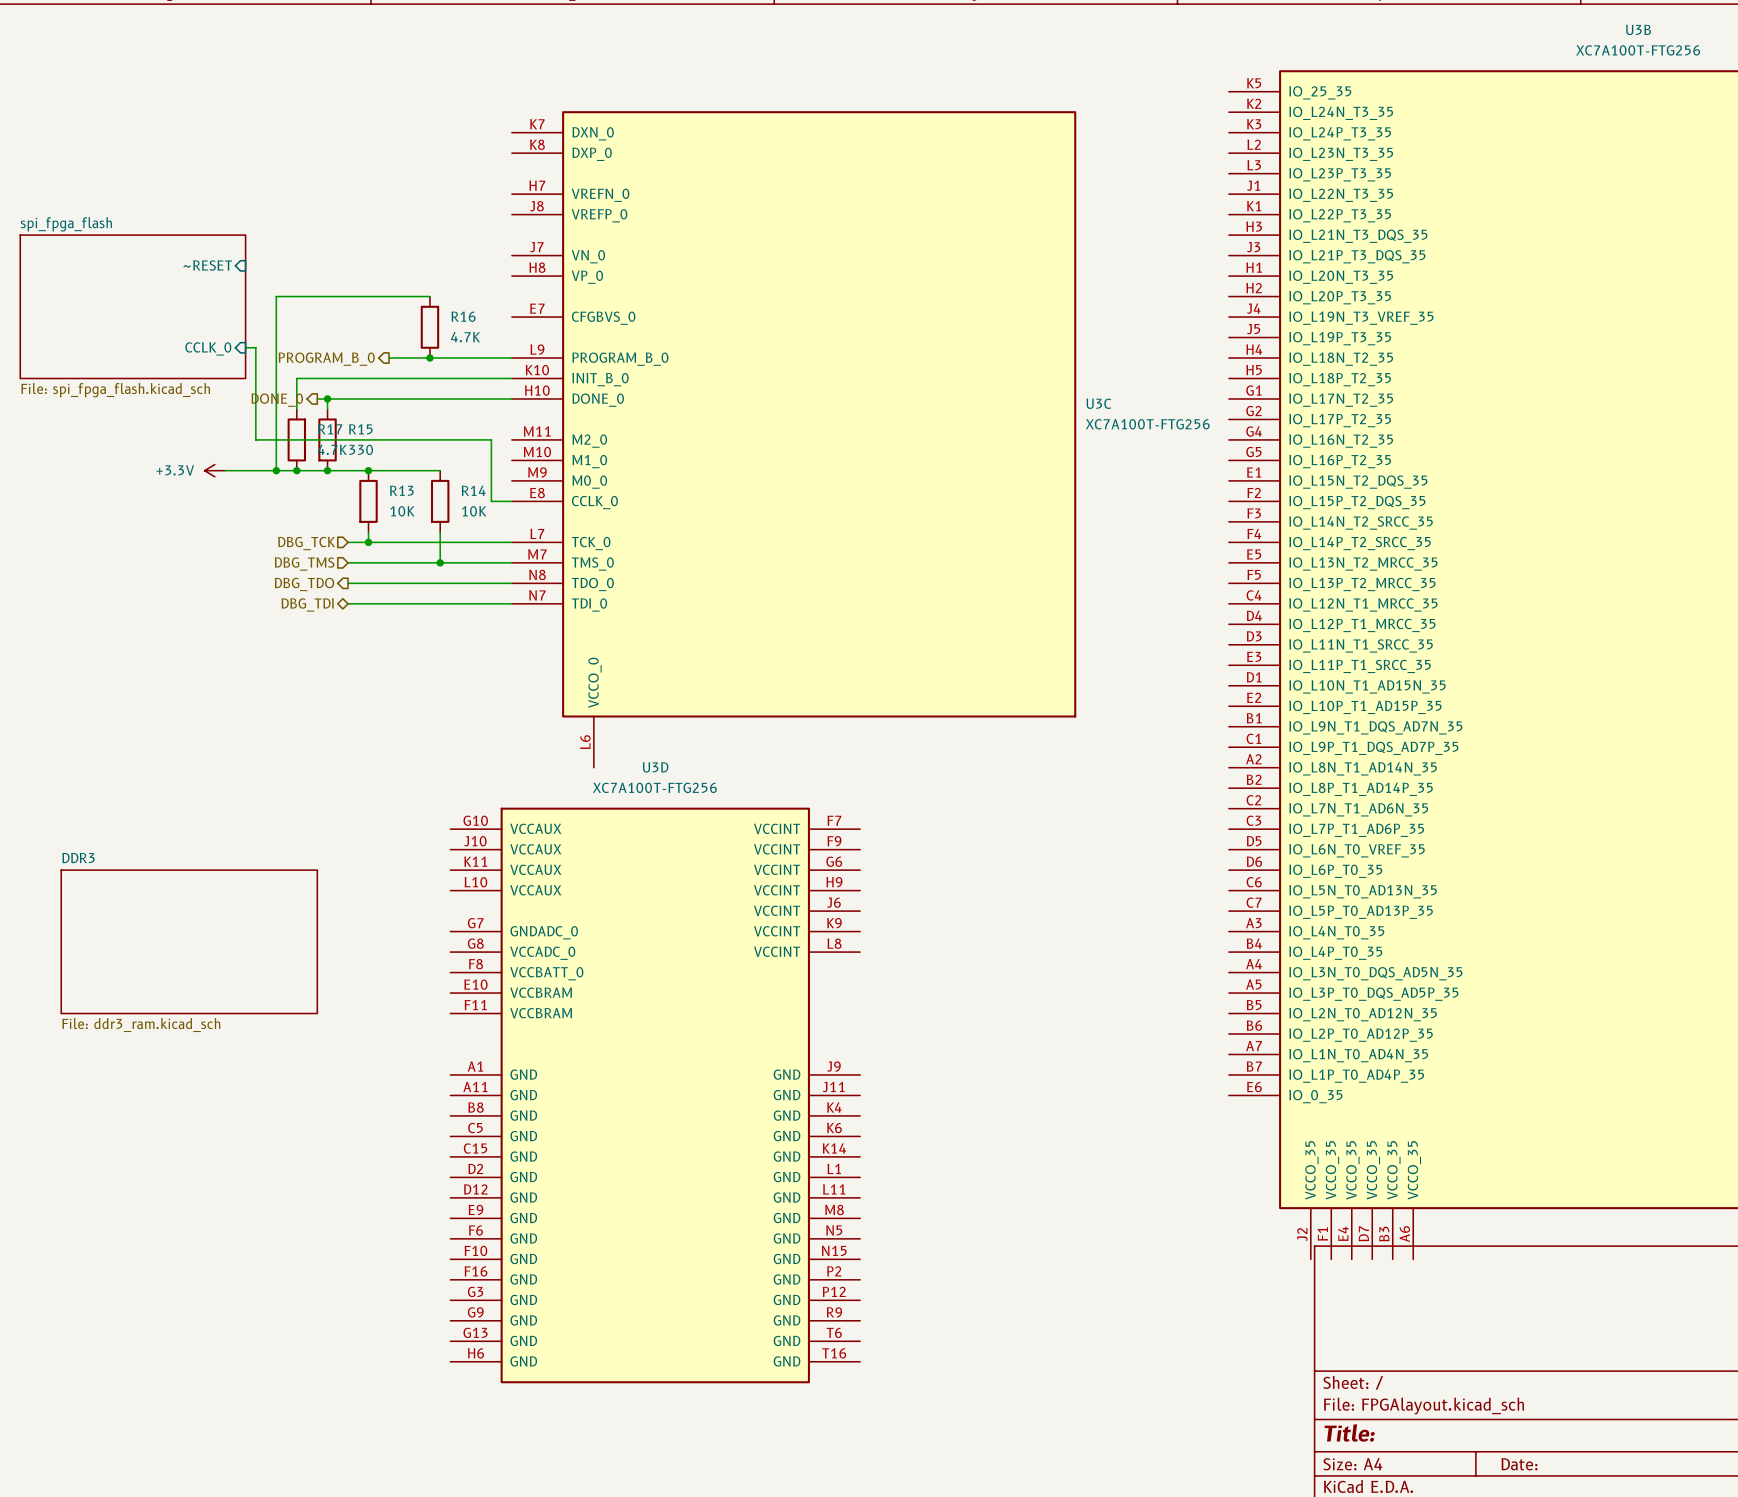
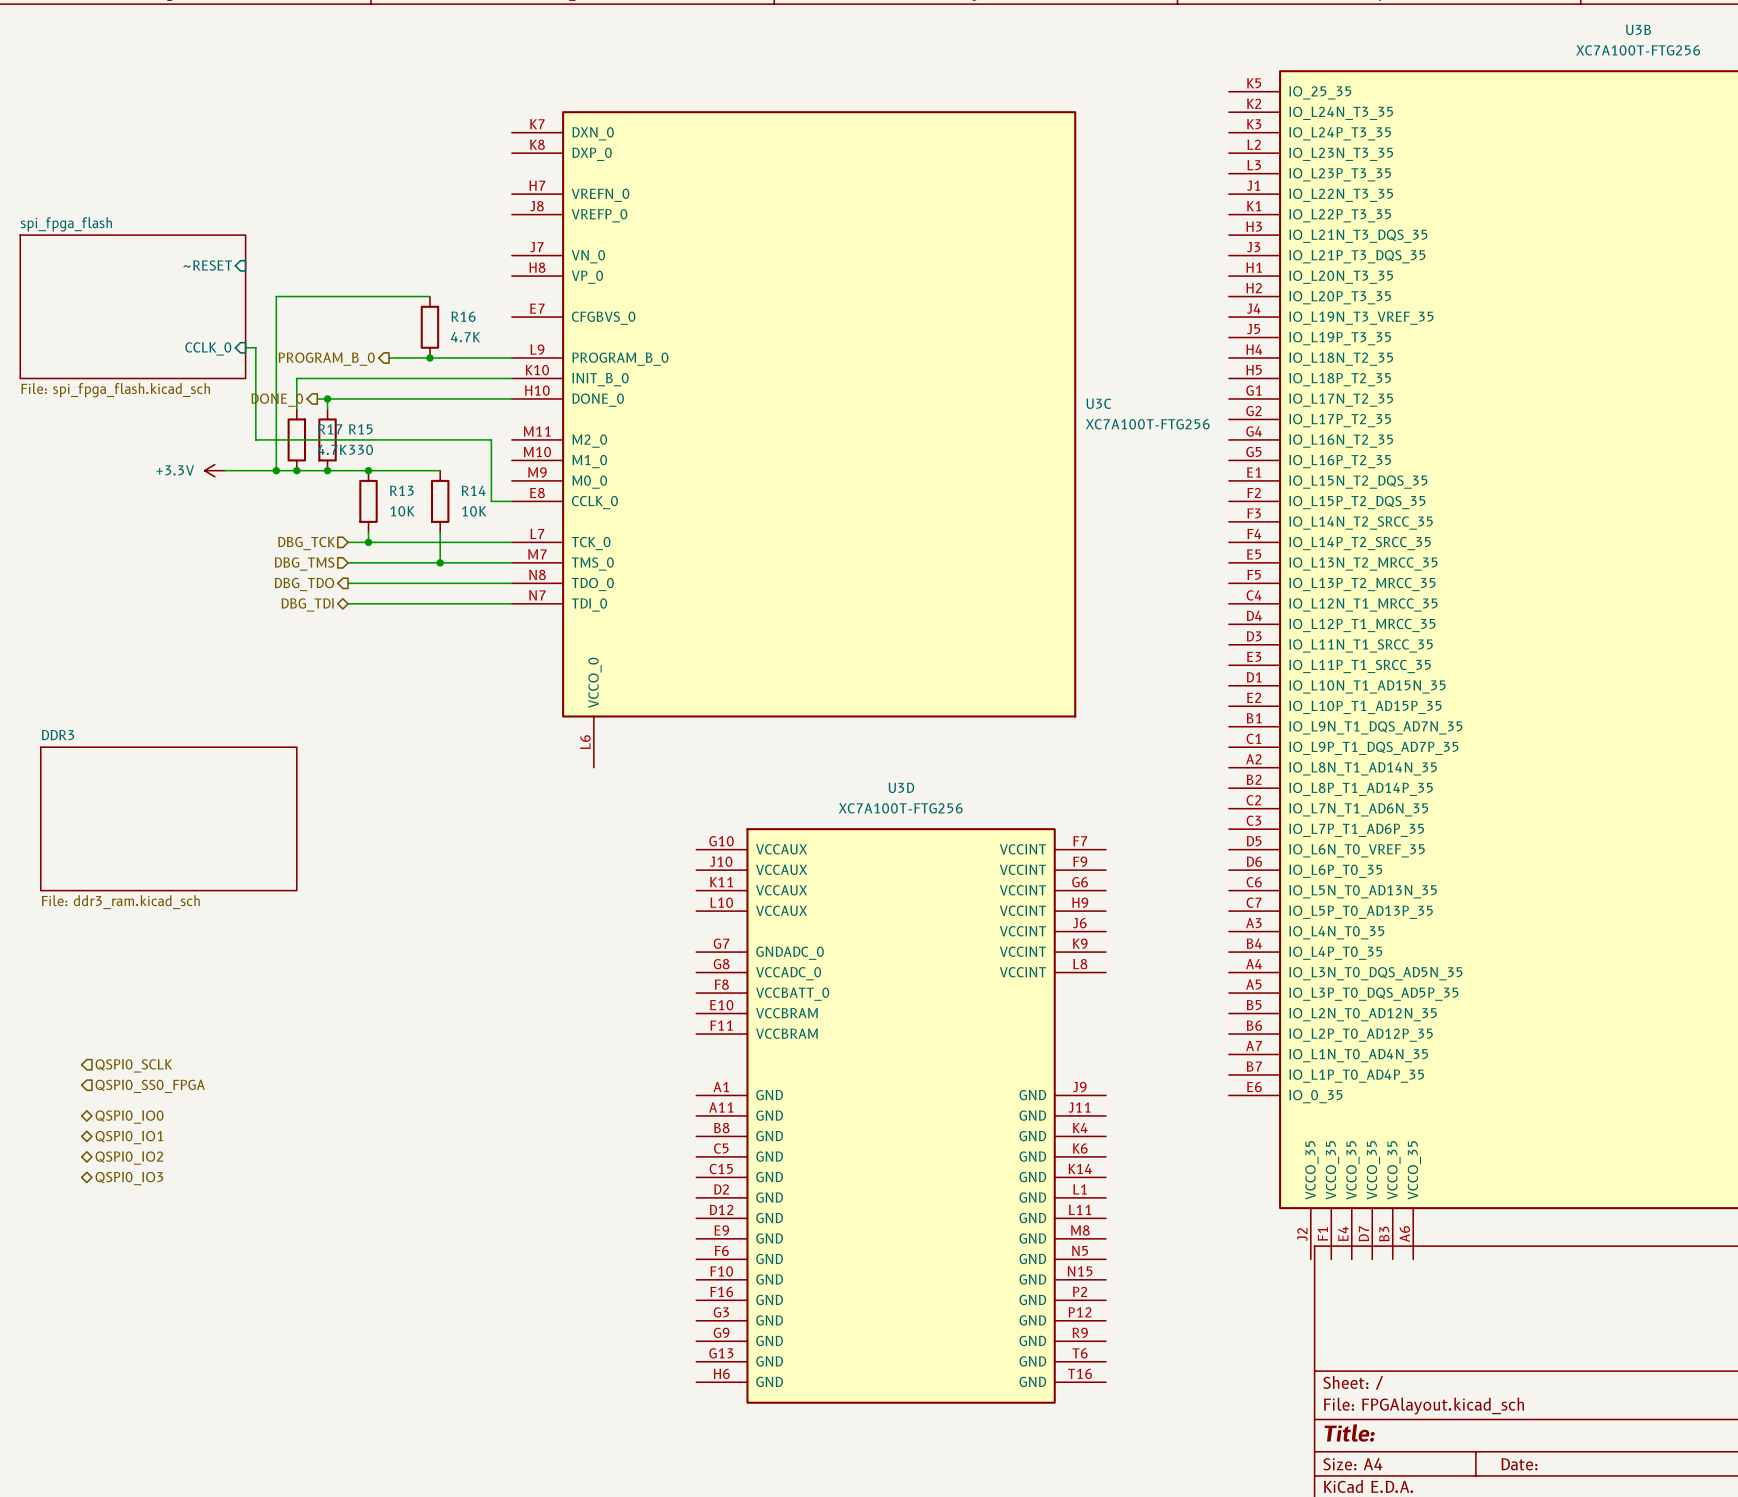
sheet DDR3 position: (189, 941) -> (168, 818)
hierarchical label: none -> QSPI0_SCLK (133, 1065)
hierarchical label: none -> QSPI0_SS0_FPGA (150, 1086)
U3D position: (655, 1095) -> (901, 1115)
hierarchical label: none -> QSPI0_IO0 (129, 1117)
hierarchical label: none -> QSPI0_IO1 (129, 1137)
hierarchical label: none -> QSPI0_IO2 (129, 1158)
hierarchical label: none -> QSPI0_IO3 (129, 1178)

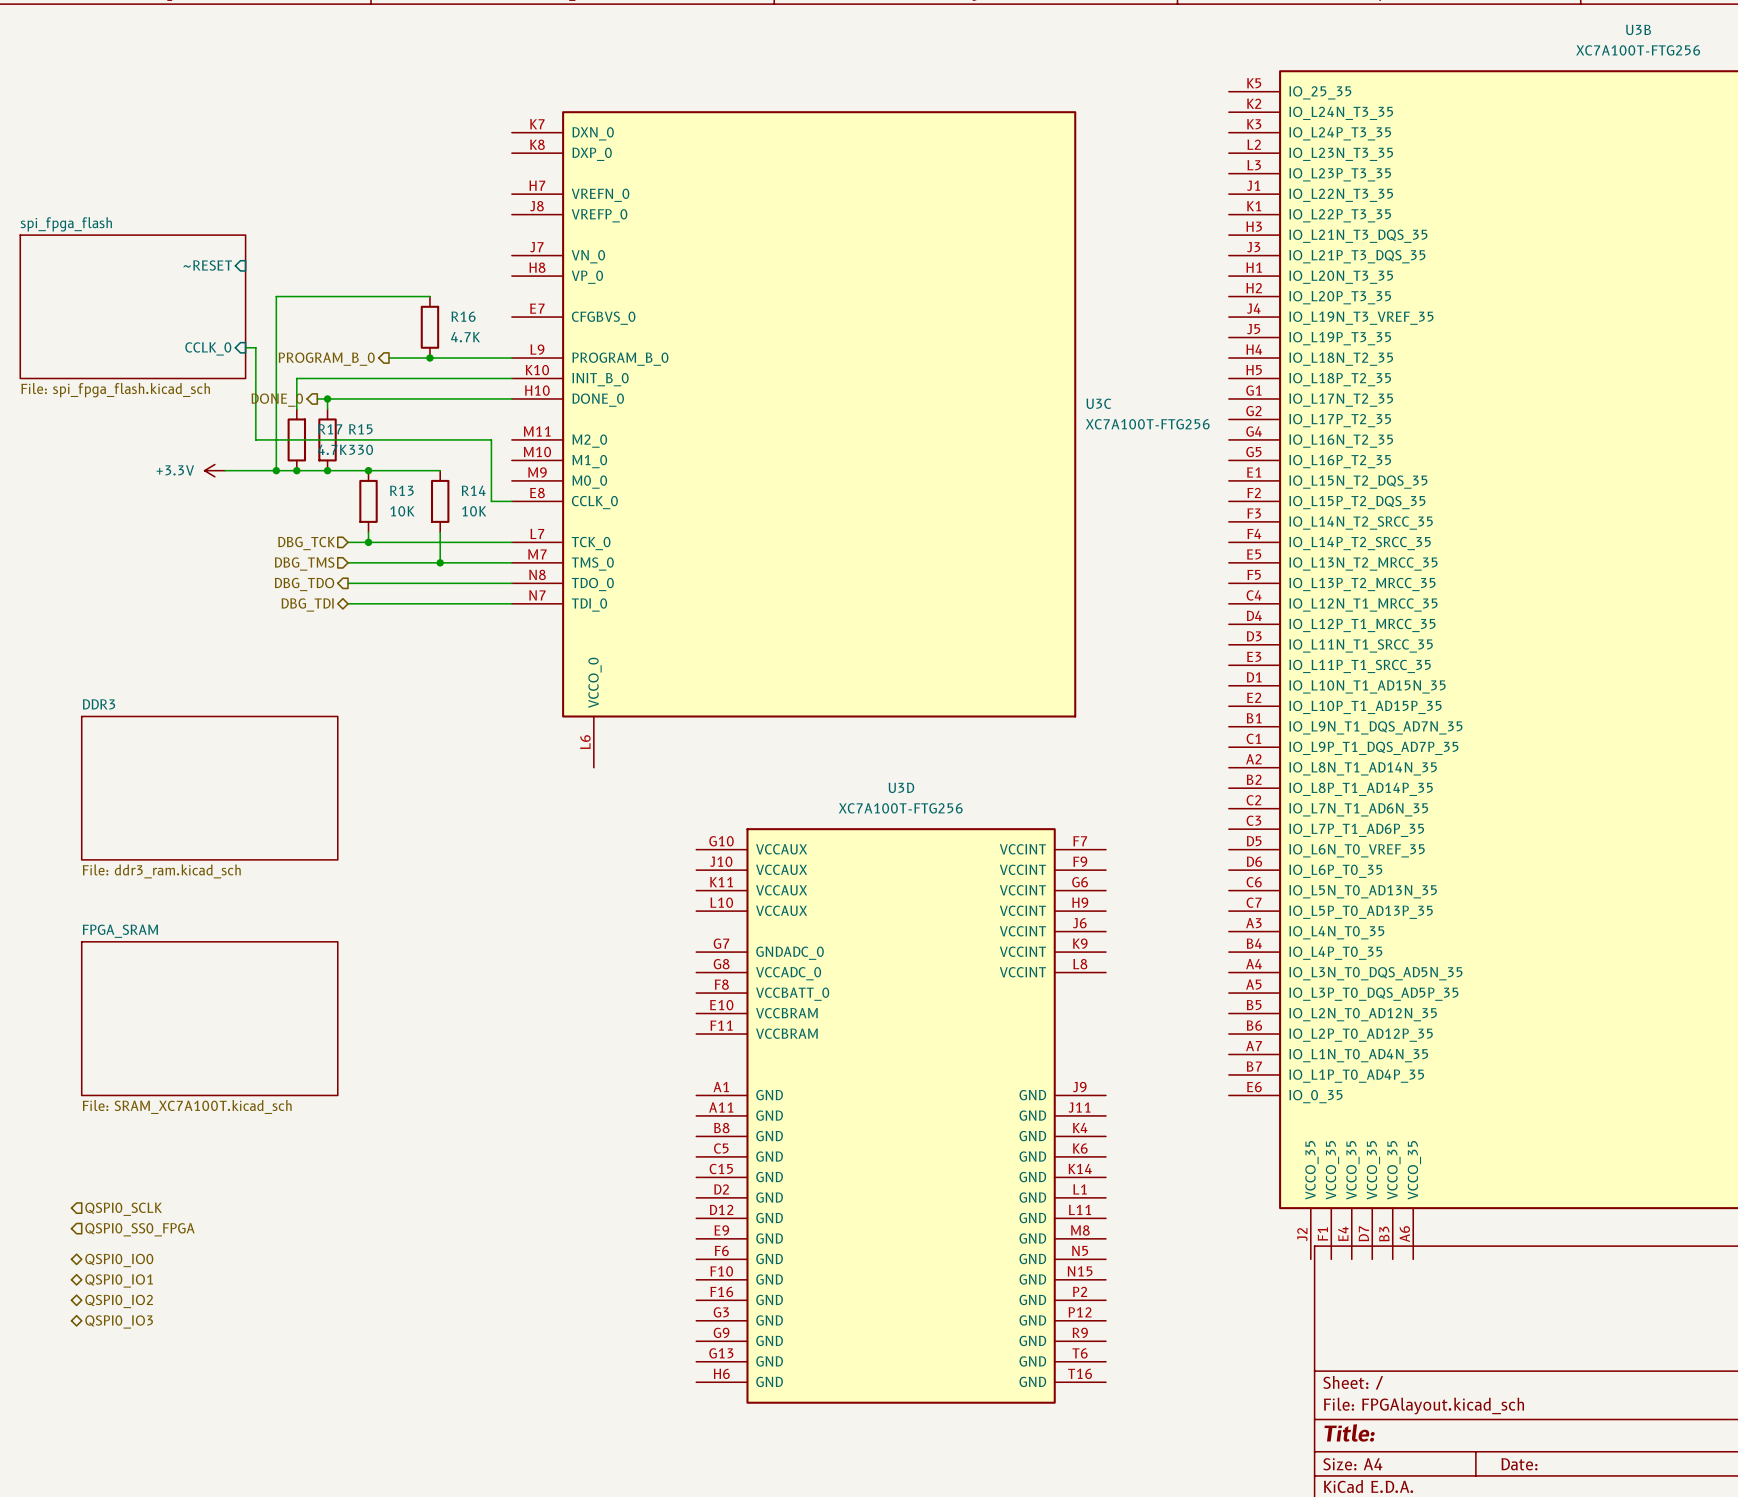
sheet DDR3 position: (168, 818) -> (209, 788)
sheet FPGA_SRAM: none -> File: SRAM_XC7A100T.kicad_sch (209, 1018)
hierarchical label position: QSPI0_SCLK (133, 1065) -> QSPI0_SCLK (123, 1209)
hierarchical label position: QSPI0_SS0_FPGA (150, 1086) -> QSPI0_SS0_FPGA (139, 1229)
hierarchical label position: QSPI0_IO0 (129, 1117) -> QSPI0_IO0 (119, 1260)
hierarchical label position: QSPI0_IO1 (129, 1137) -> QSPI0_IO1 (119, 1280)
hierarchical label position: QSPI0_IO2 (129, 1158) -> QSPI0_IO2 (119, 1301)
hierarchical label position: QSPI0_IO3 (129, 1178) -> QSPI0_IO3 (119, 1321)

